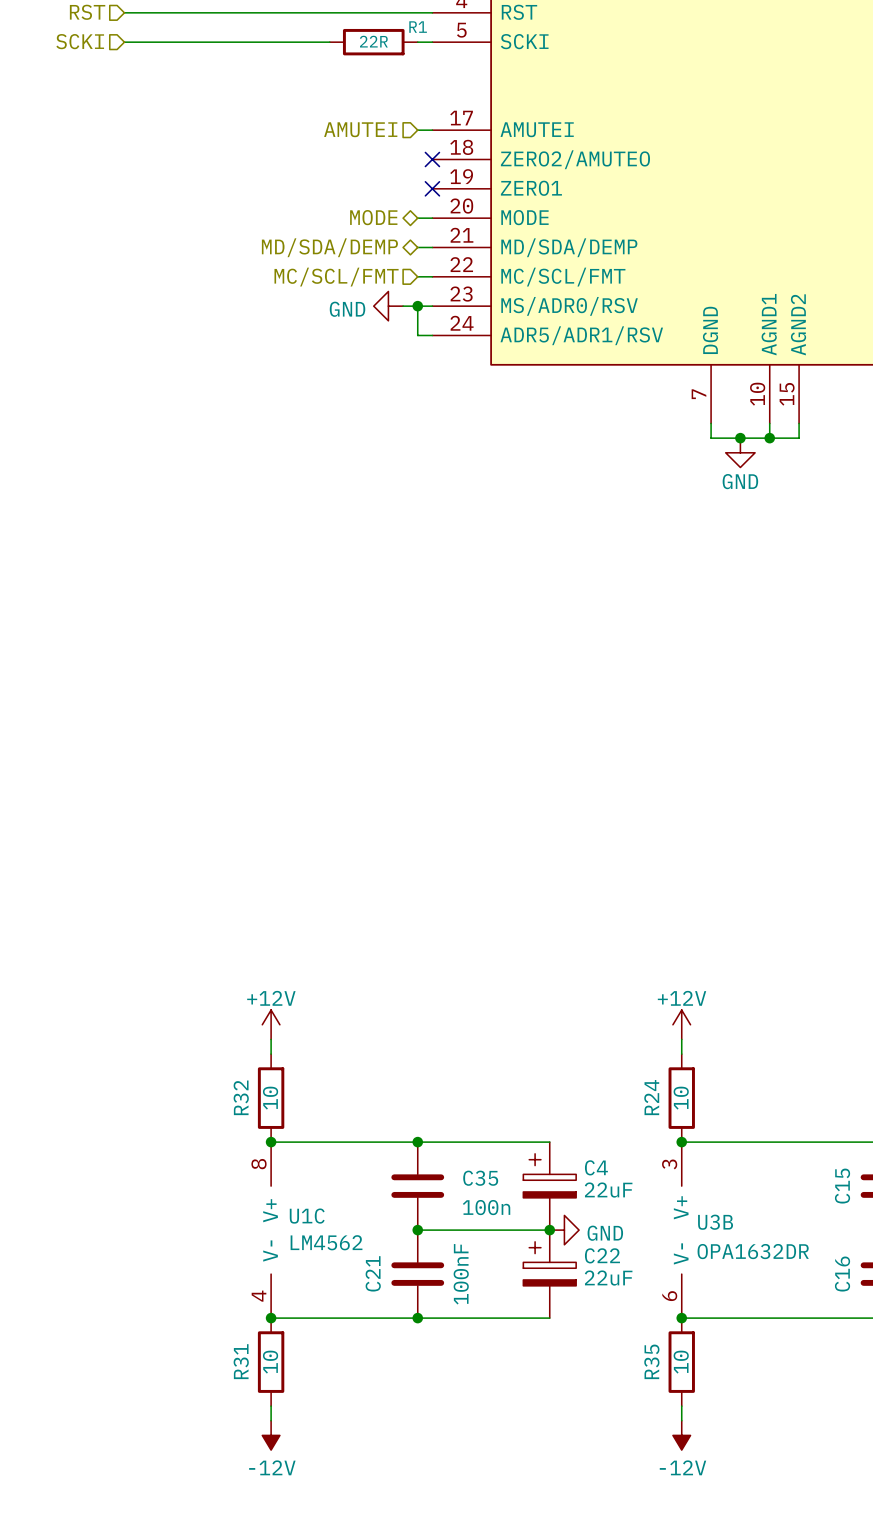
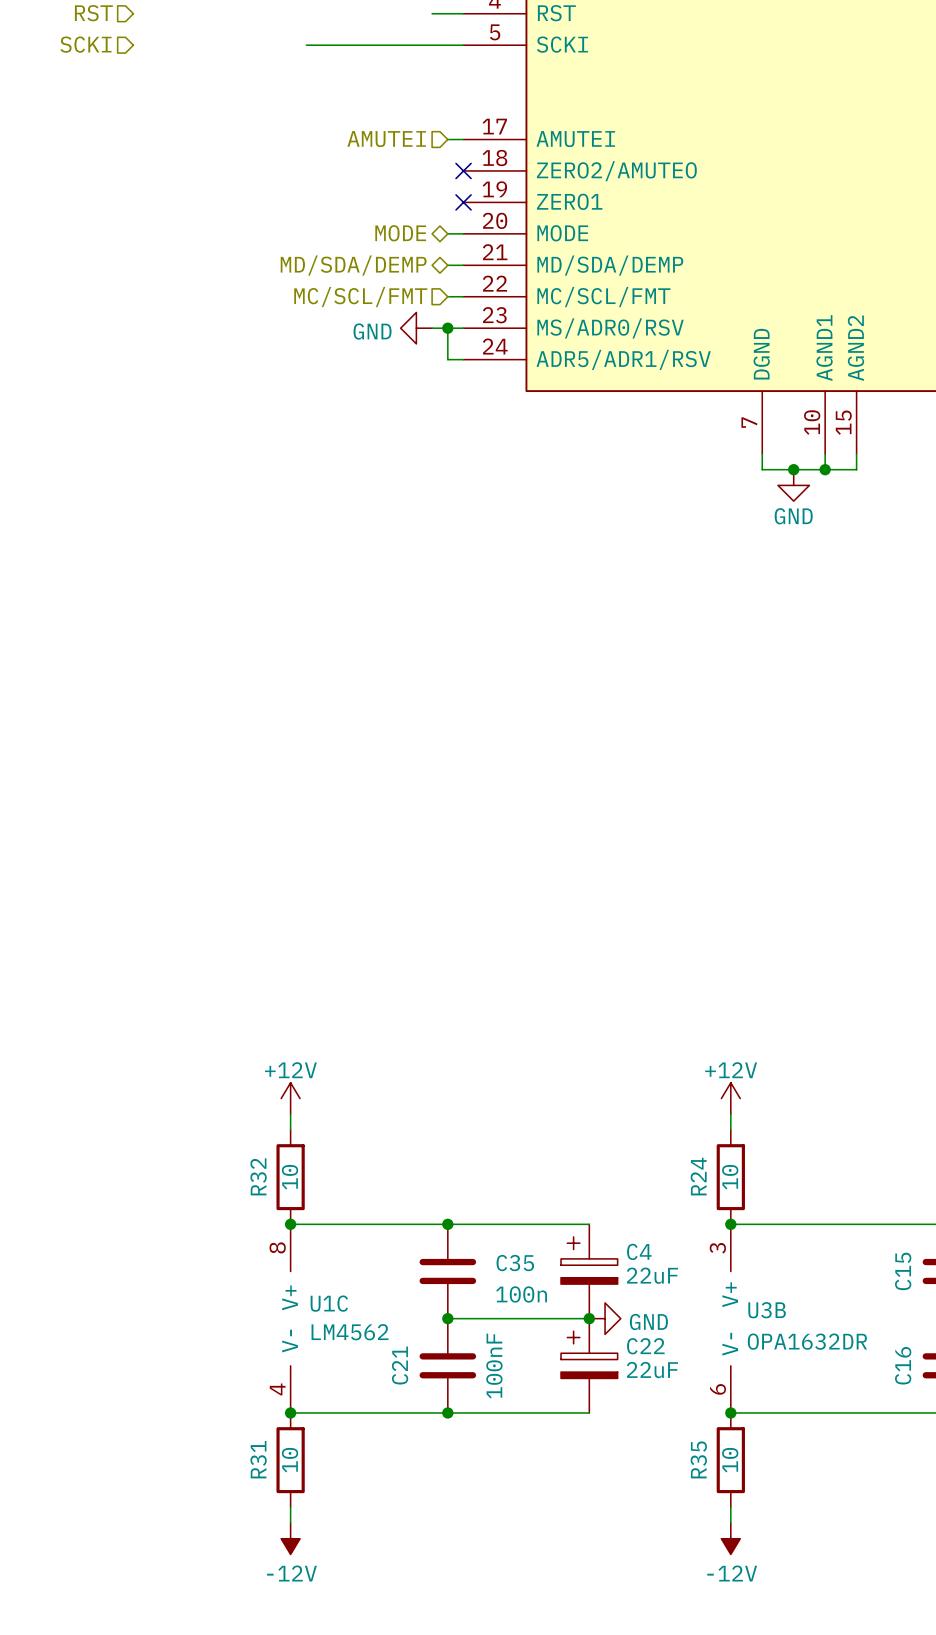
wire: (124, 12) (403, 12) -> none
wire: (124, 42) (285, 42) -> none
wire: none -> (353, 45) (447, 45)
R1: 22R (373, 42) -> none

